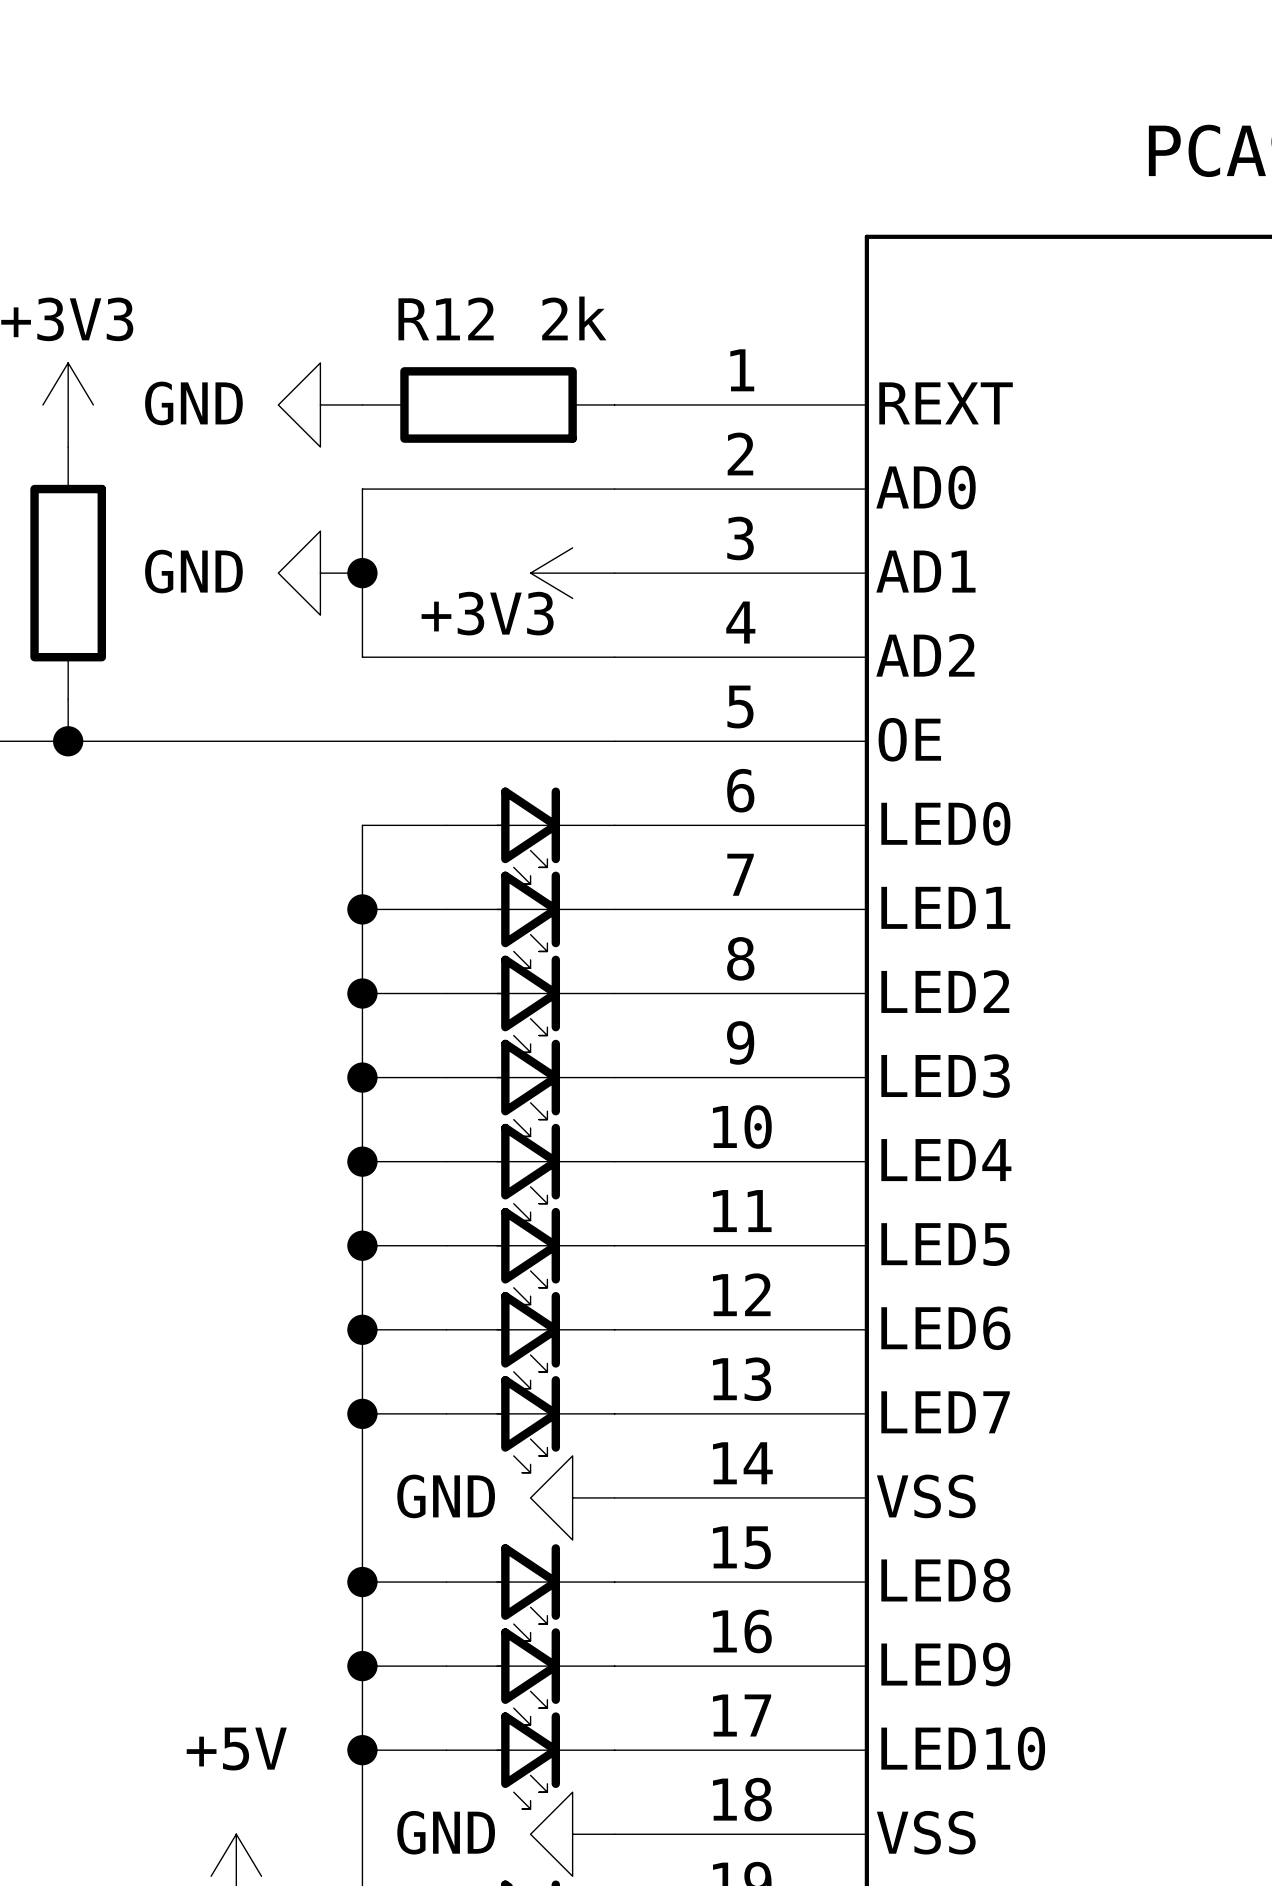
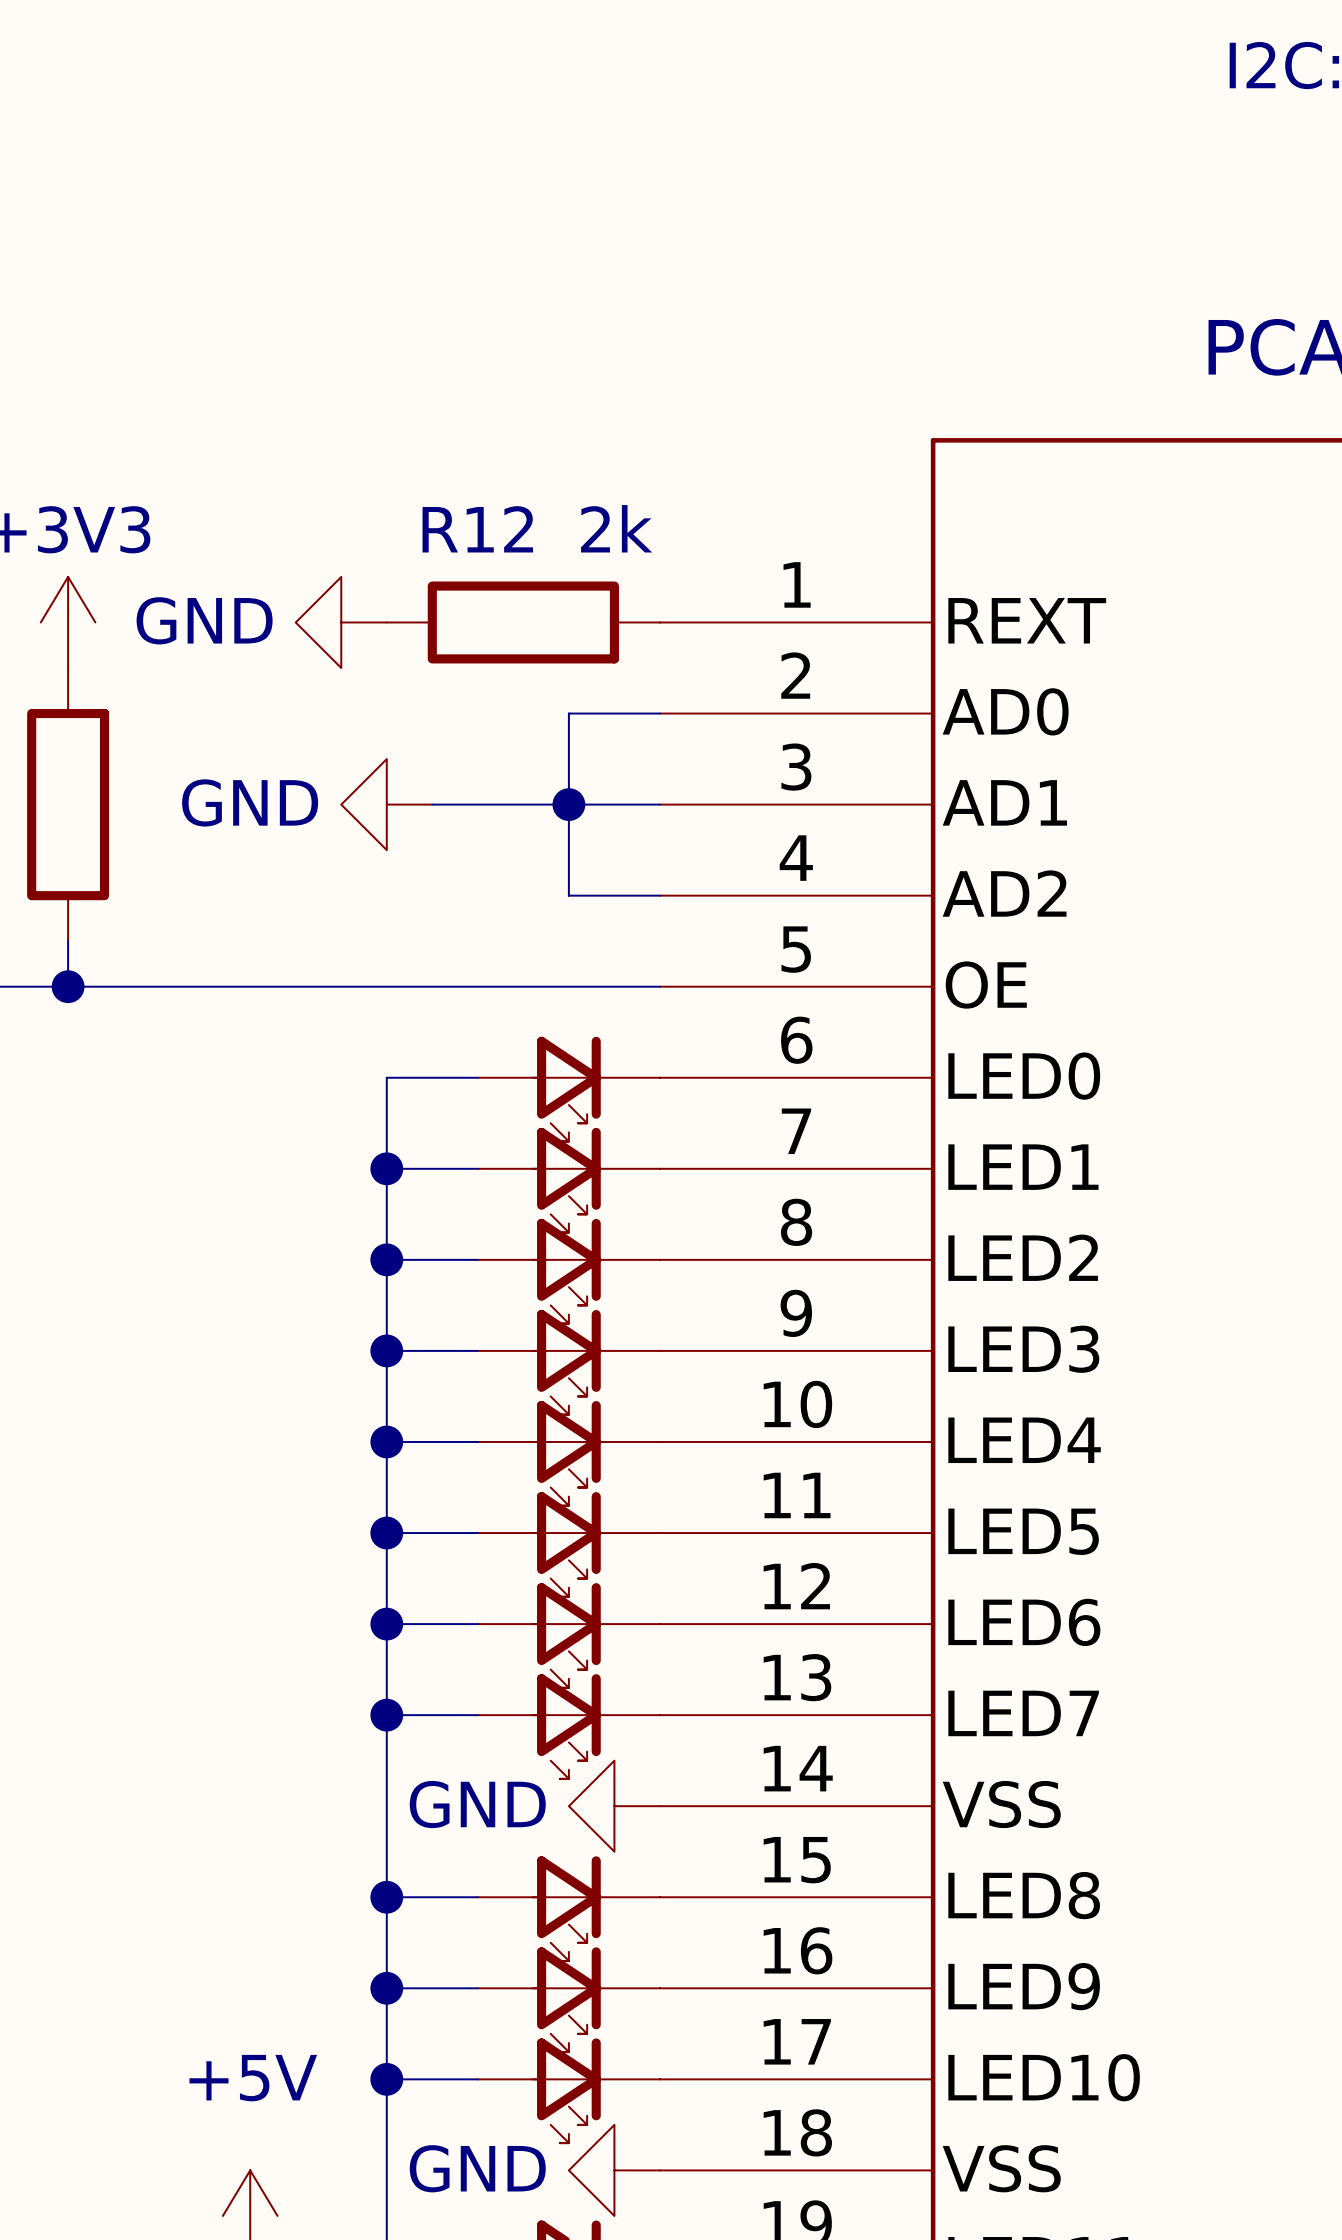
wire: (530, 489) (362, 489) (362, 657) (530, 657) -> (568, 713) (568, 895)
power symbol position: GND (320, 573) -> GND (386, 804)
junction position: (362, 573) -> (568, 804)
wire: none -> (432, 804) (659, 804)
power symbol: +3V3 (572, 573) -> none

